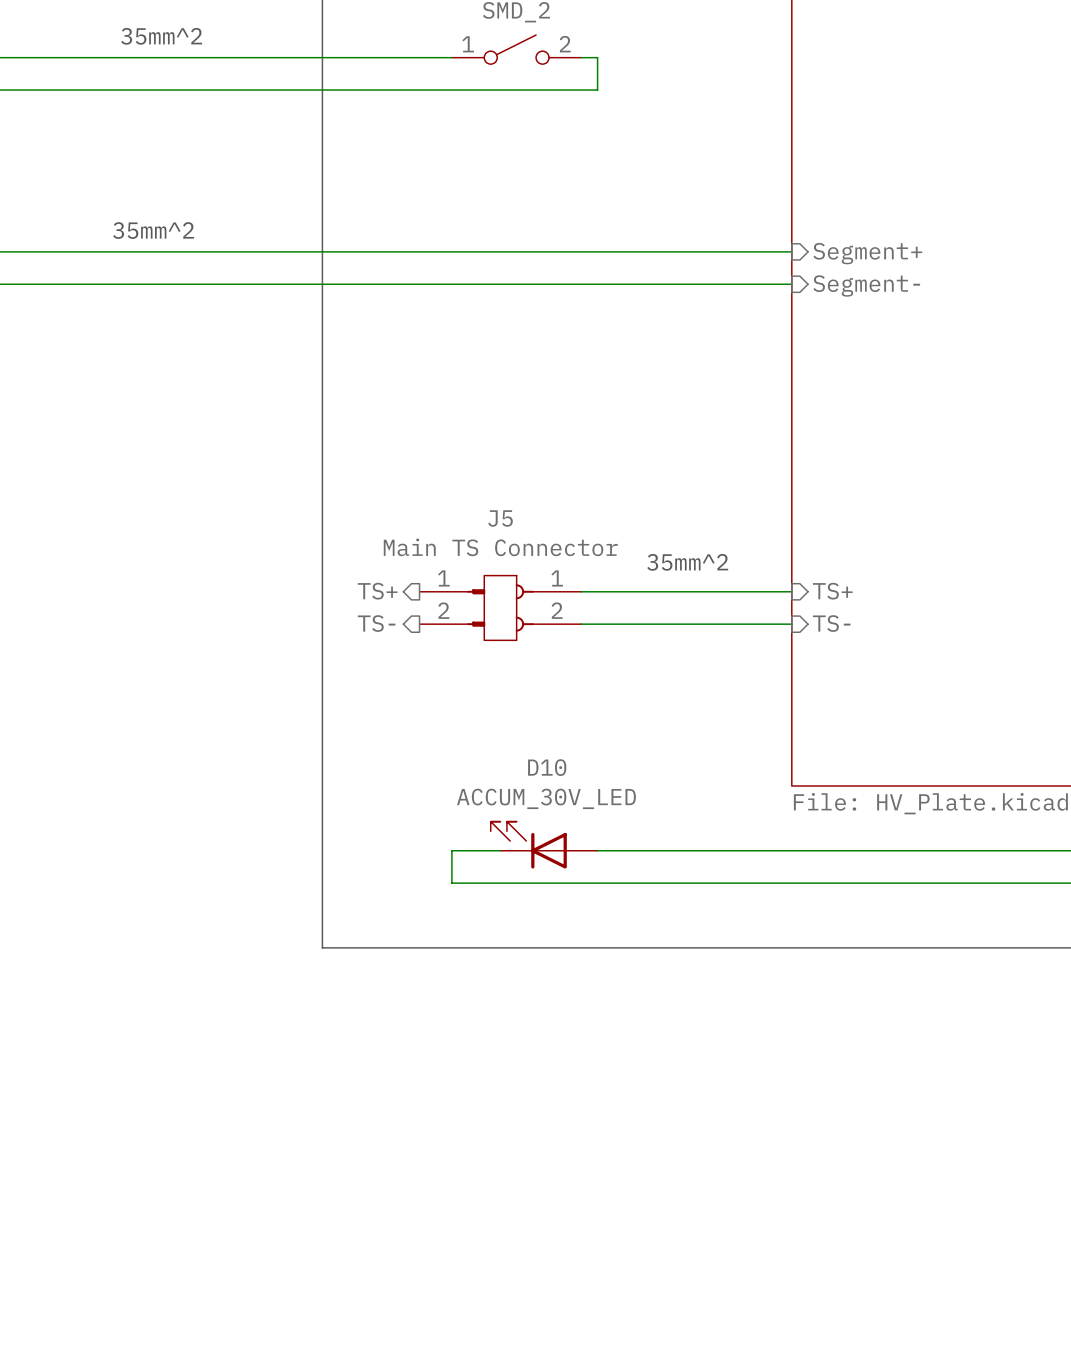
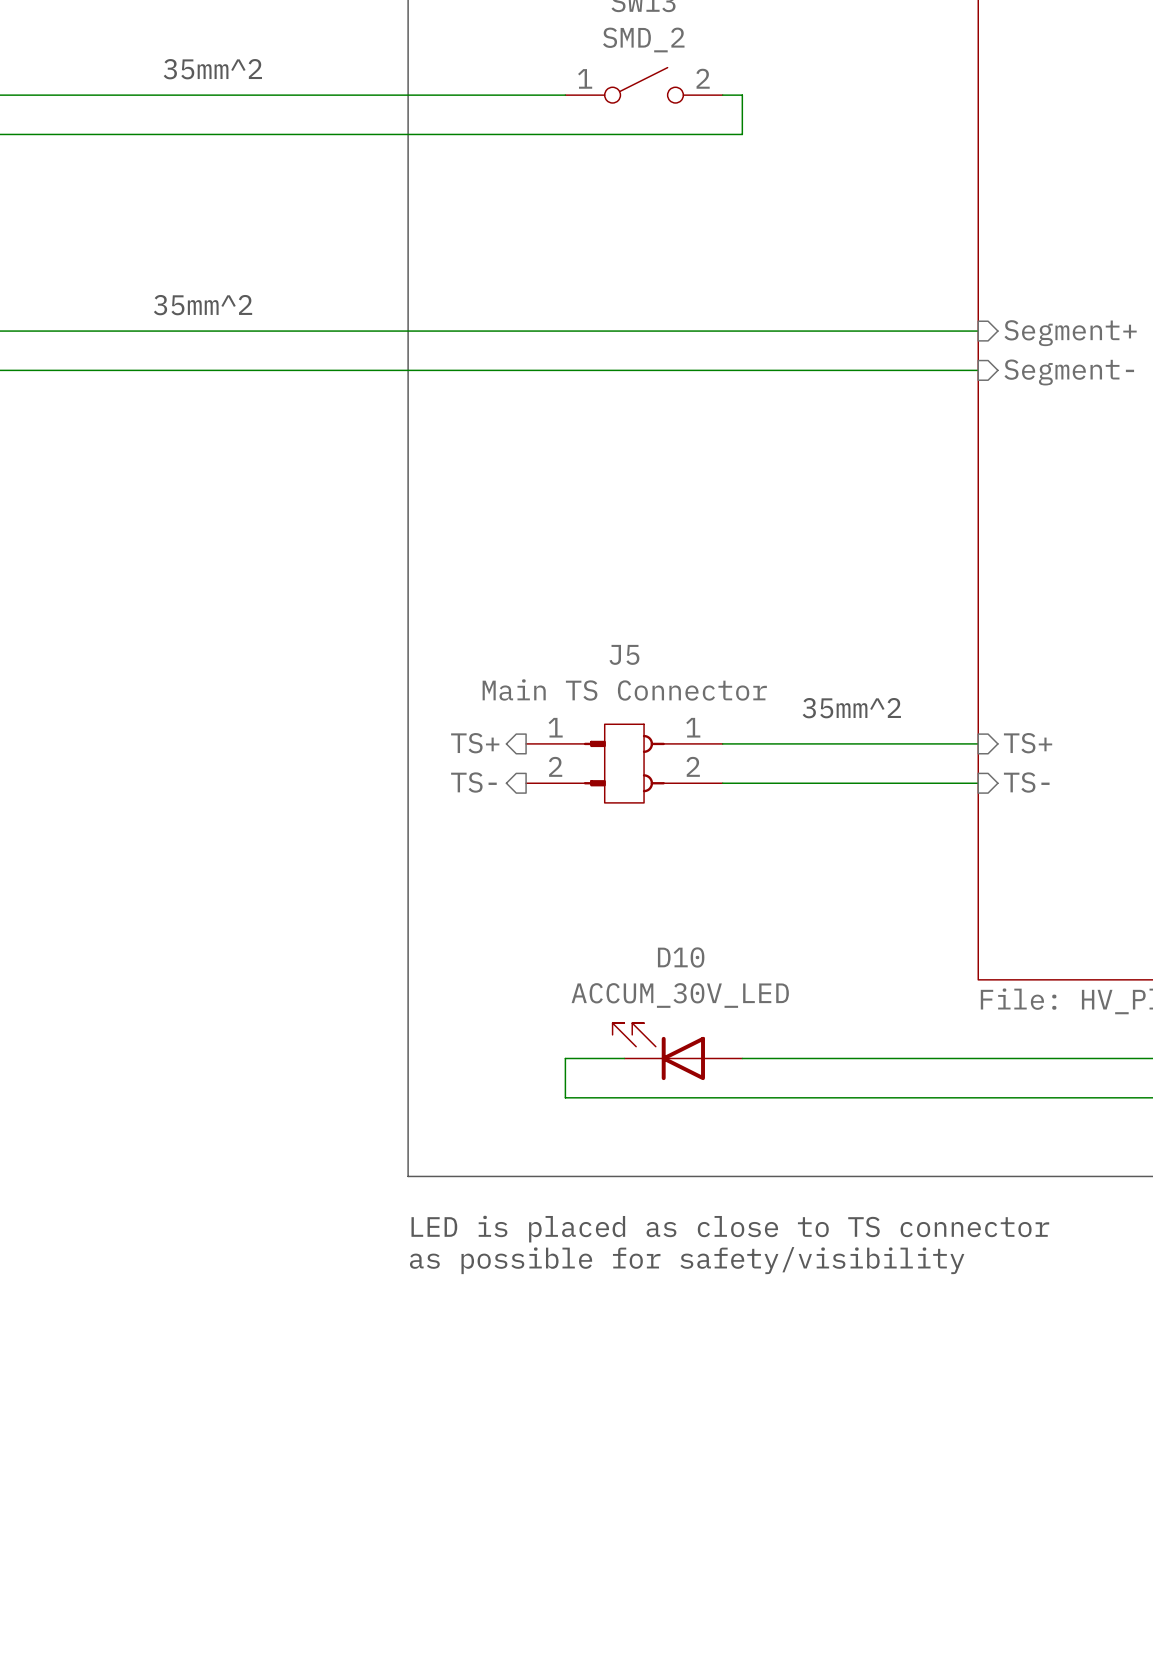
text: none -> LED is placed as close to TS connector (730, 1229)
text: none -> as possible for safety/visibility (687, 1260)

